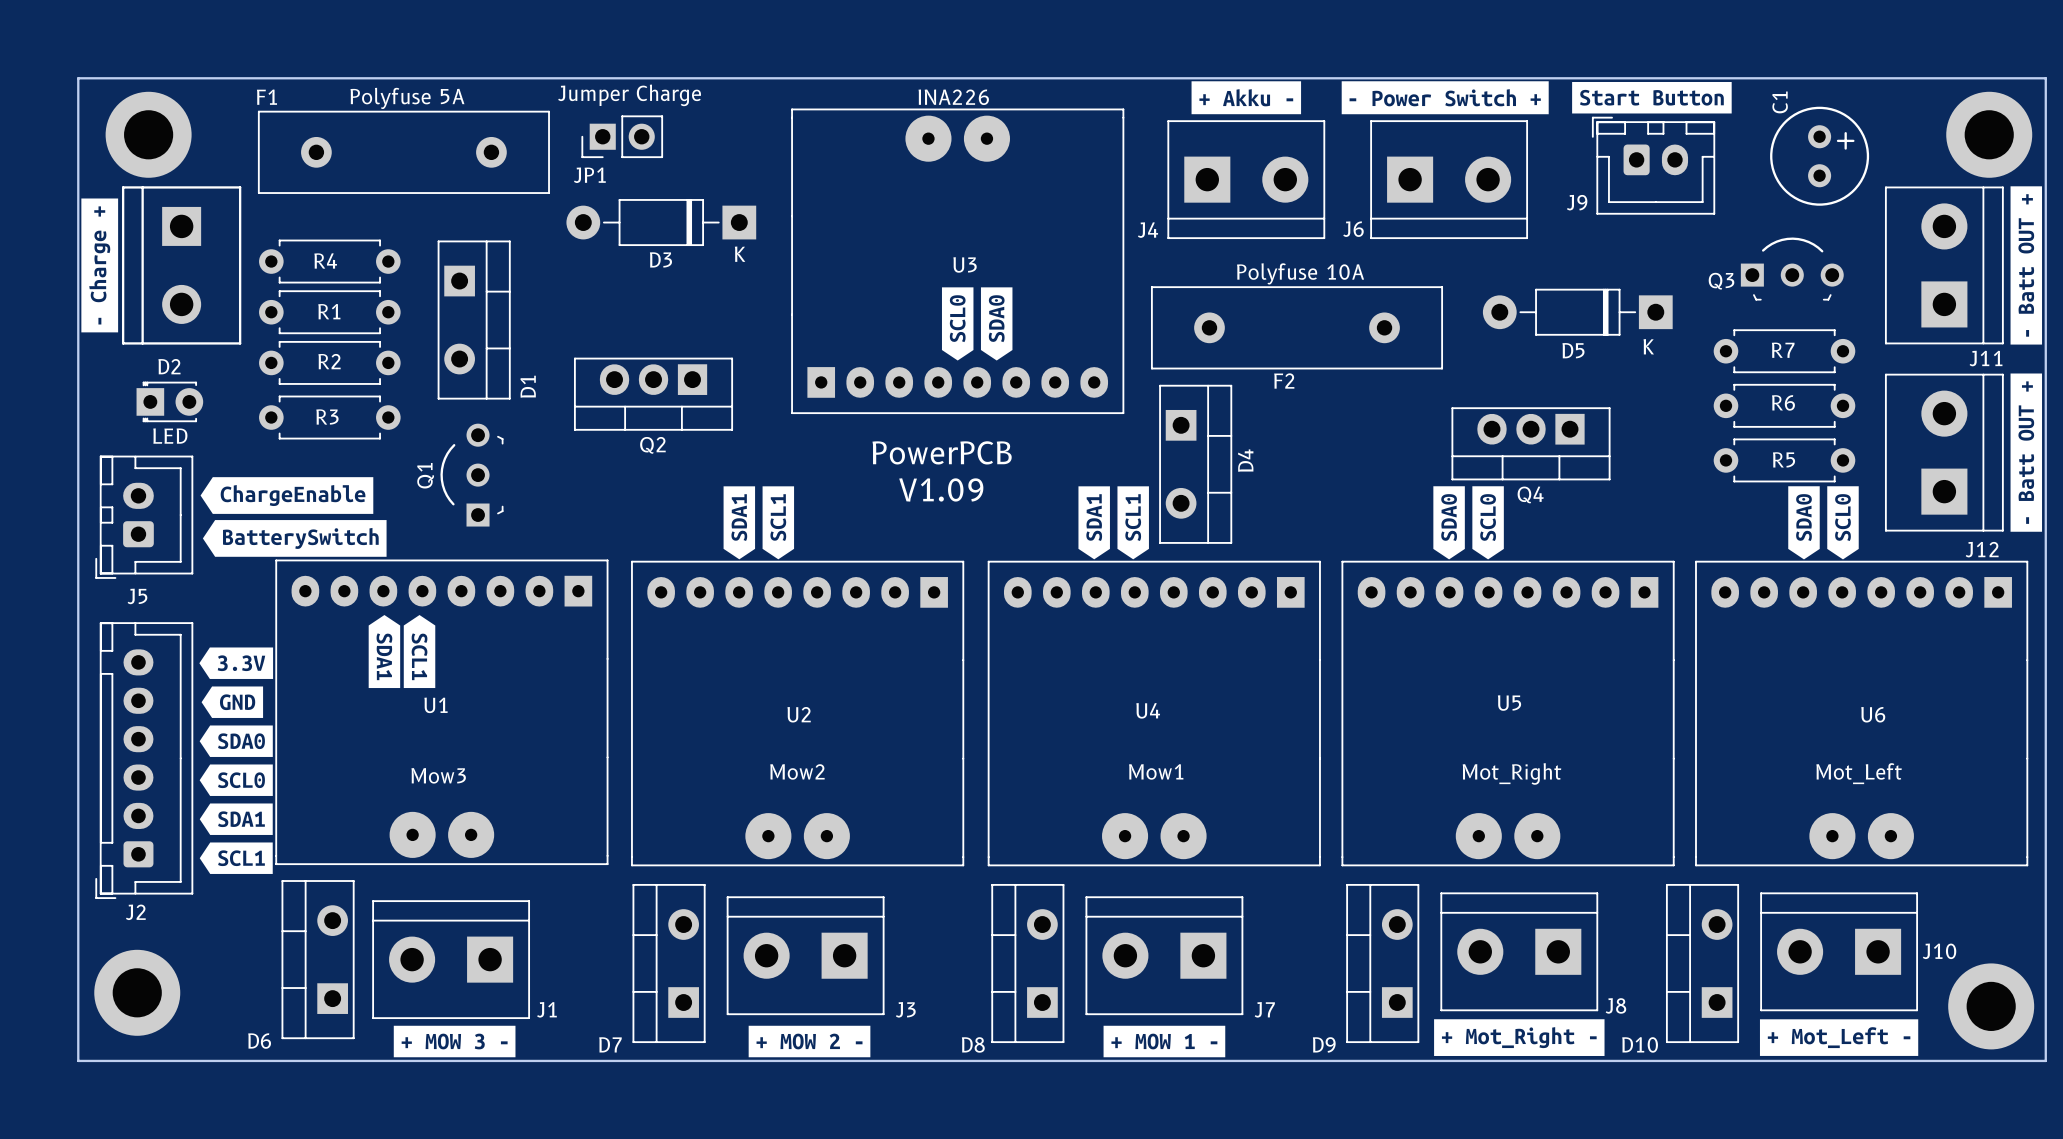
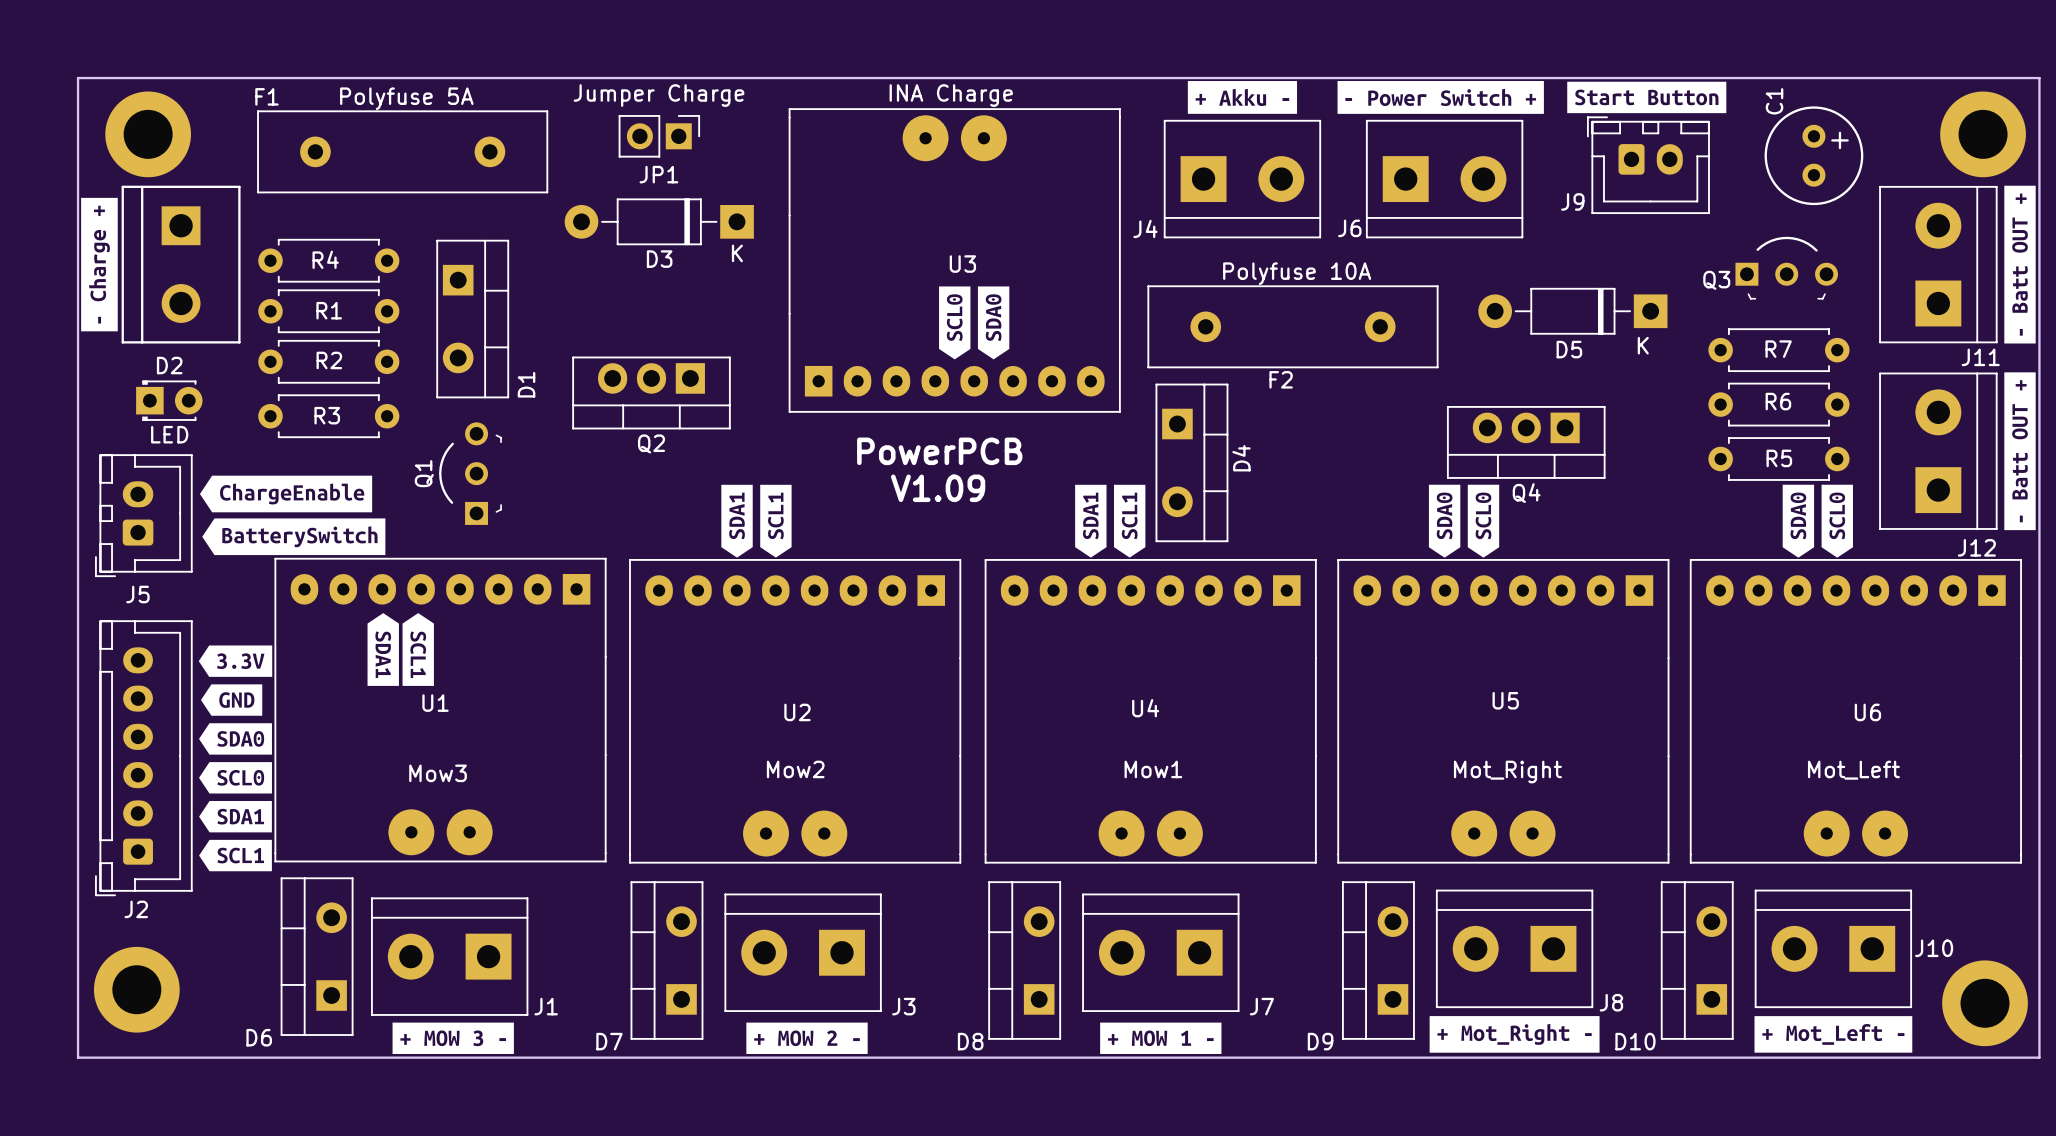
U3 value: INA226 (953, 97) -> INA Charge (951, 95)
JP1 rotation: 0° (622, 136) -> 180° (659, 136)
JP1 name position: JP1 (589, 175) -> JP1 (658, 174)

